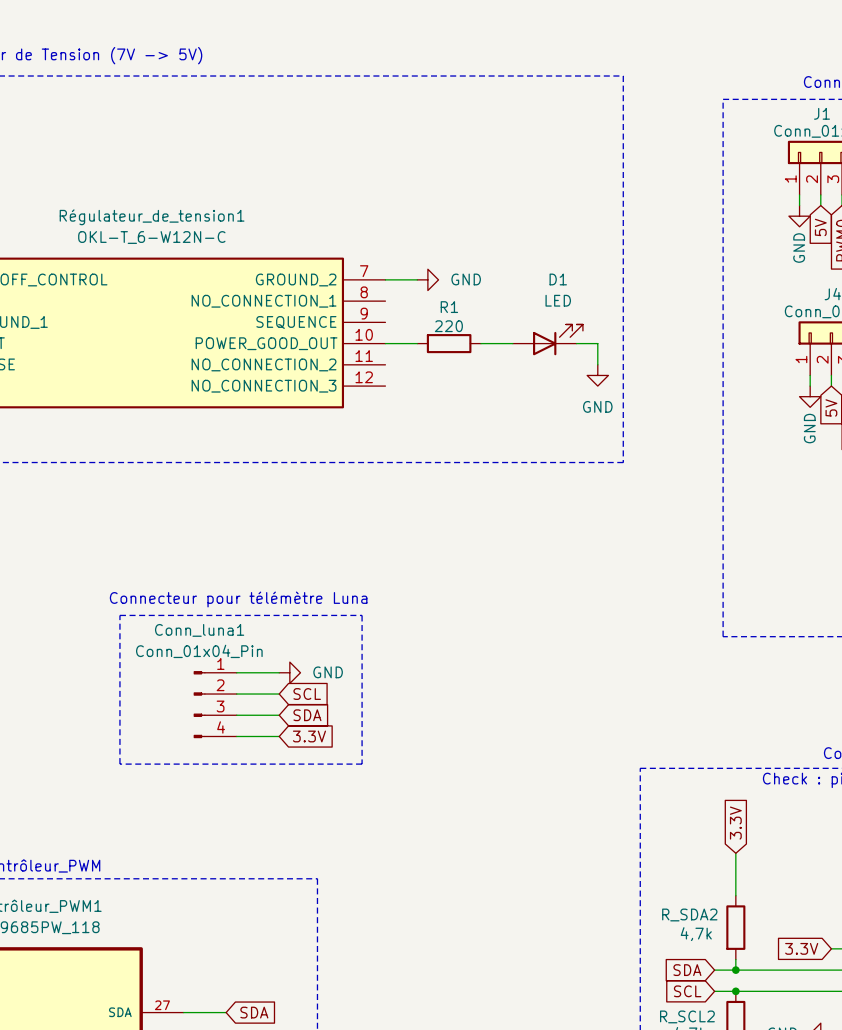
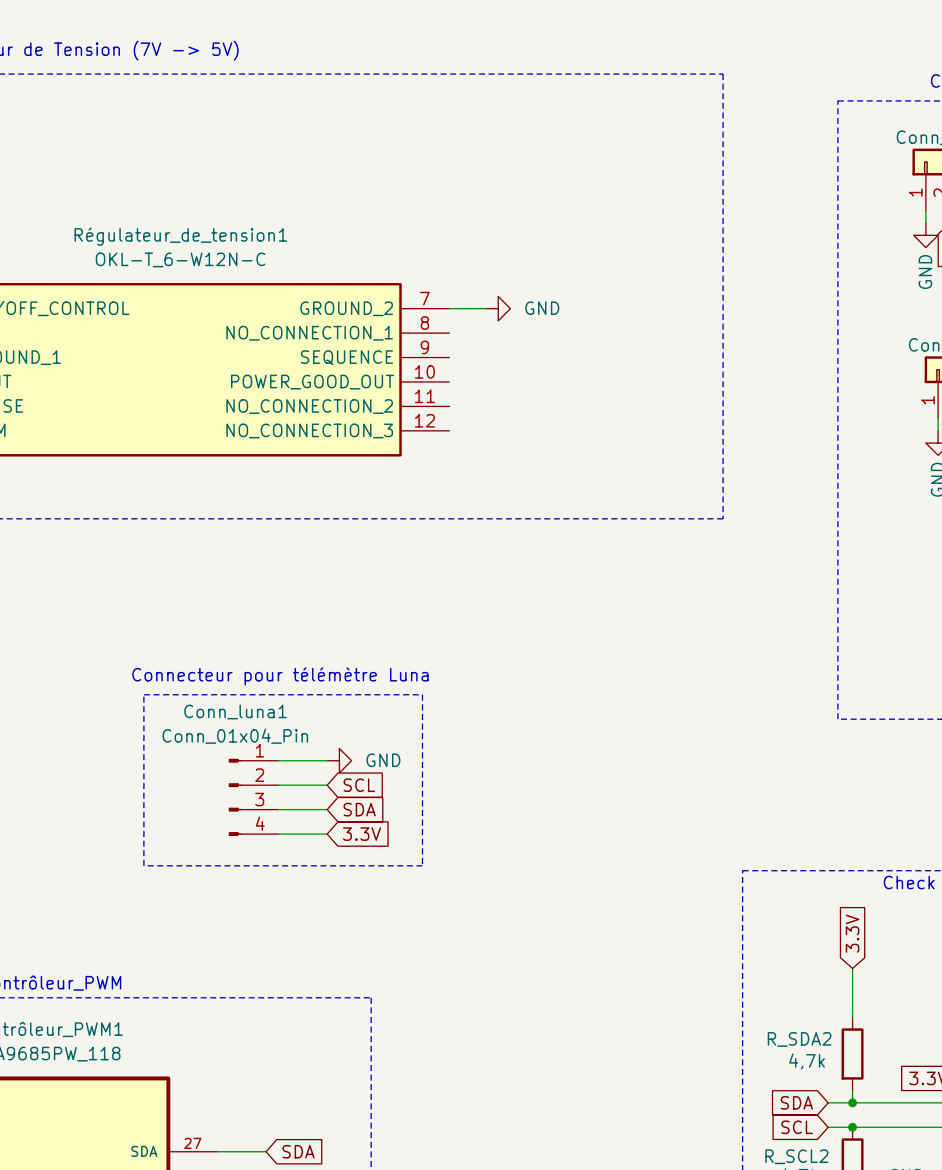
D1: LED (547, 339) -> none
wire: (385, 343) (417, 343) -> none
R1: 220 (449, 343) -> none
wire: (480, 343) (512, 343) -> none
wire: (576, 343) (597, 343) (597, 364) -> none
power symbol: GND (597, 375) -> none

